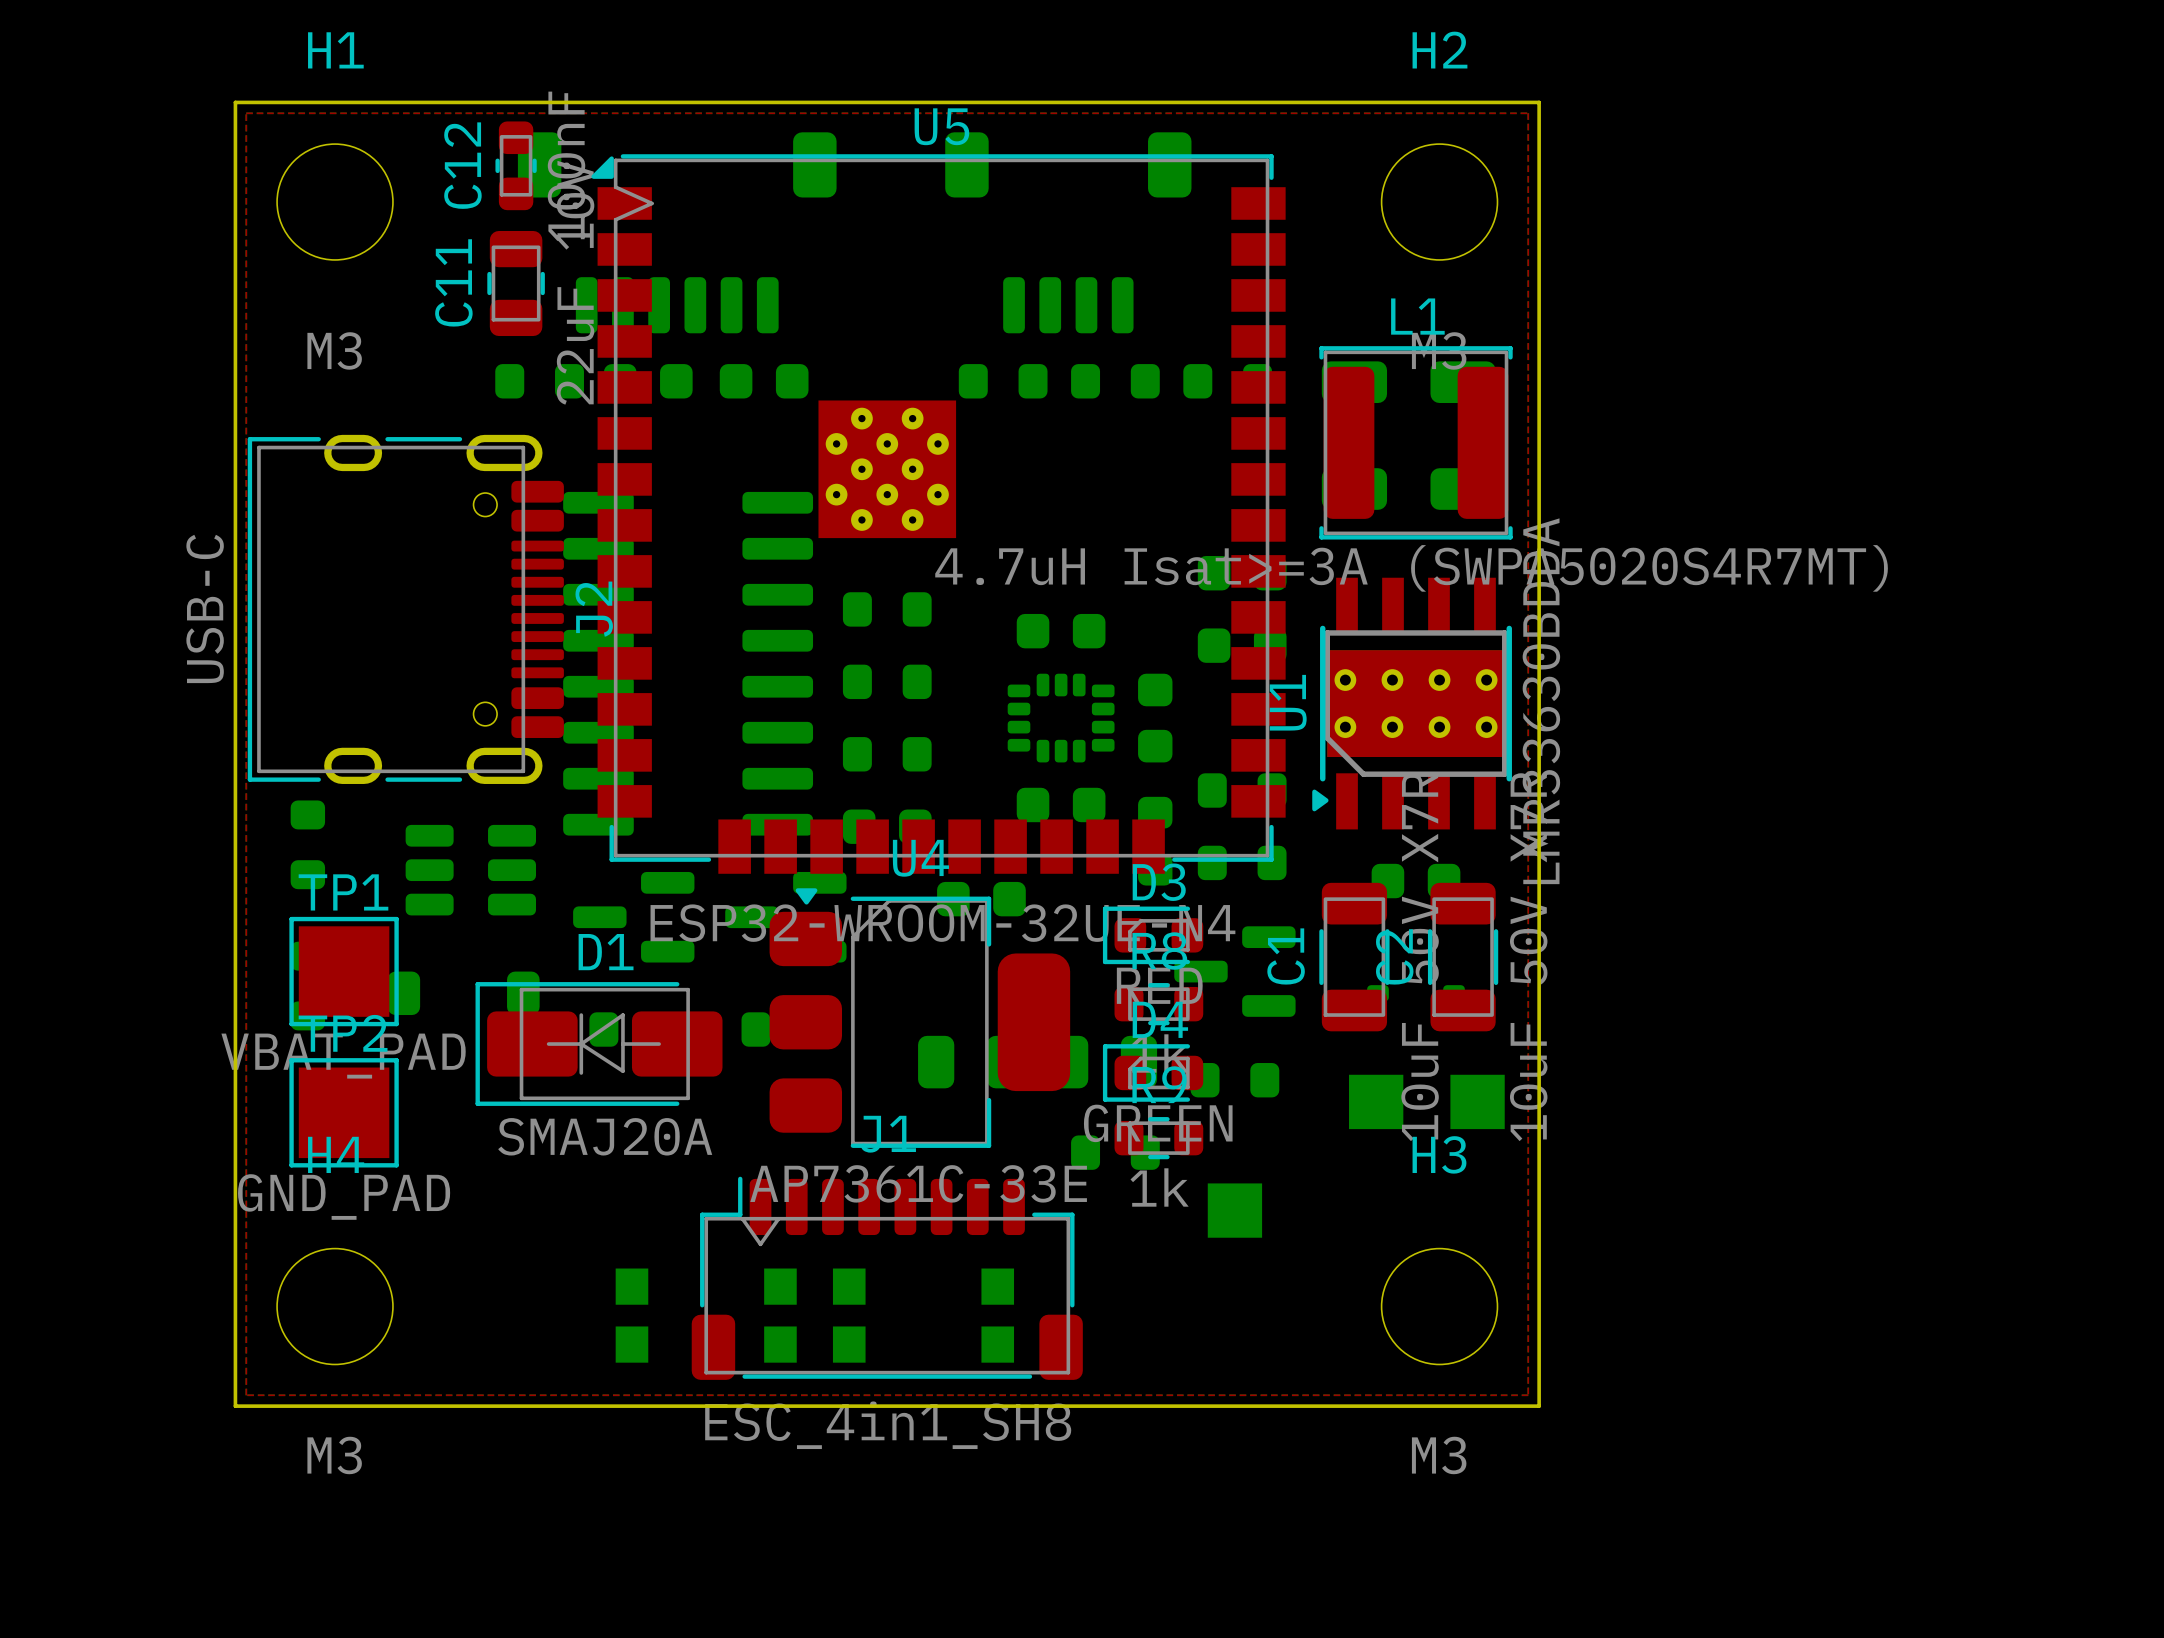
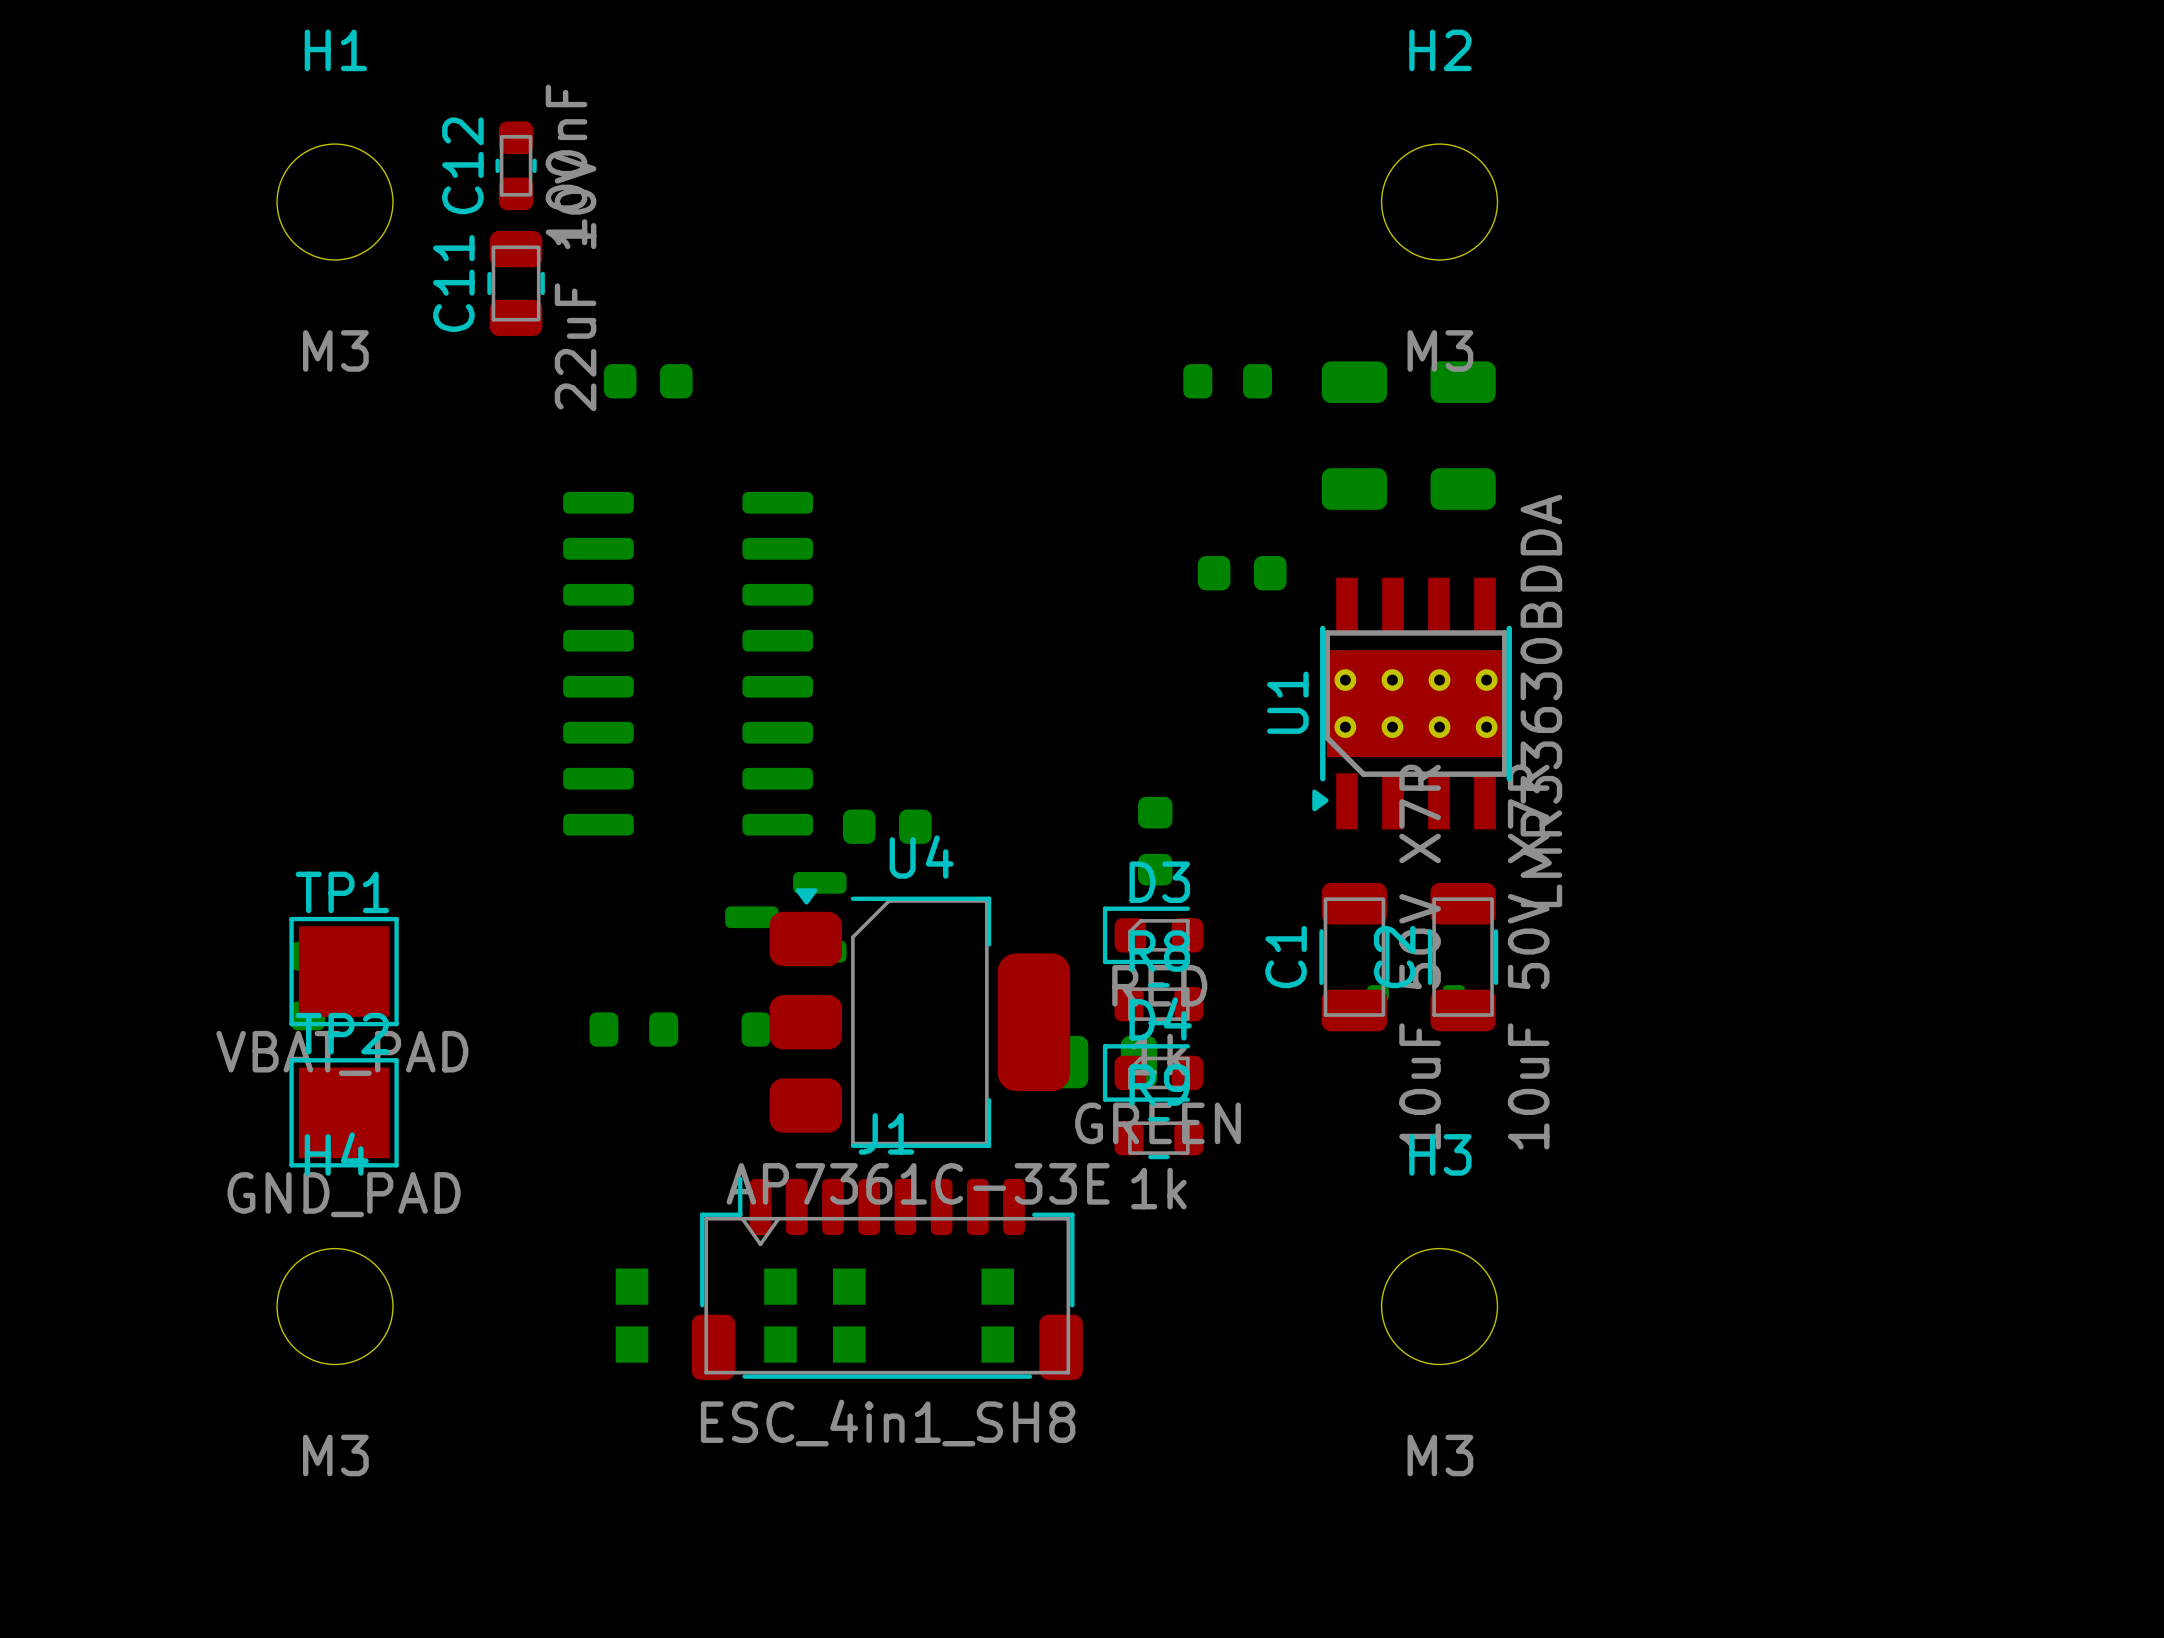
board edge: (235, 102) (1539, 102) (1539, 1406) (235, 1406) (235, 102) -> none
top zone outline: (246, 113) (1528, 113) (1528, 1395) (246, 1395) (246, 113) -> none
part: (677, 232) -> none
part: (1068, 232) -> none
part: (539, 381) -> none
part: (764, 381) -> none
part: (1003, 381) -> none
part: (1115, 381) -> none
L1: 4.7uH Isat>=3A (SWPA5020S4R7MT) (1416, 442) -> none
U5: ESP32-WROOM-32UE-N4 (938, 514) -> none
J2: USB-C (405, 609) -> none
part: (887, 609) -> none
part: (1061, 631) -> none
part: (1242, 645) -> none
part: (887, 681) -> none
part: (1061, 718) -> none
part: (1155, 718) -> none
part: (887, 754) -> none
part: (1242, 790) -> none
part: (1061, 804) -> none
part: (307, 844) -> none
part: (1242, 862) -> none
part: (470, 870) -> none
part: (1416, 881) -> none
part: (981, 899) -> none
part: (633, 917) -> none
part: (1234, 971) -> none
part: (463, 993) -> none
D1: SMAJ20A (599, 1043) -> none
part: (970, 1062) -> none
part: (1234, 1080) -> none
part: (1376, 1101) -> none
part: (1477, 1101) -> none
part: (1115, 1152) -> none
part: (1234, 1210) -> none

